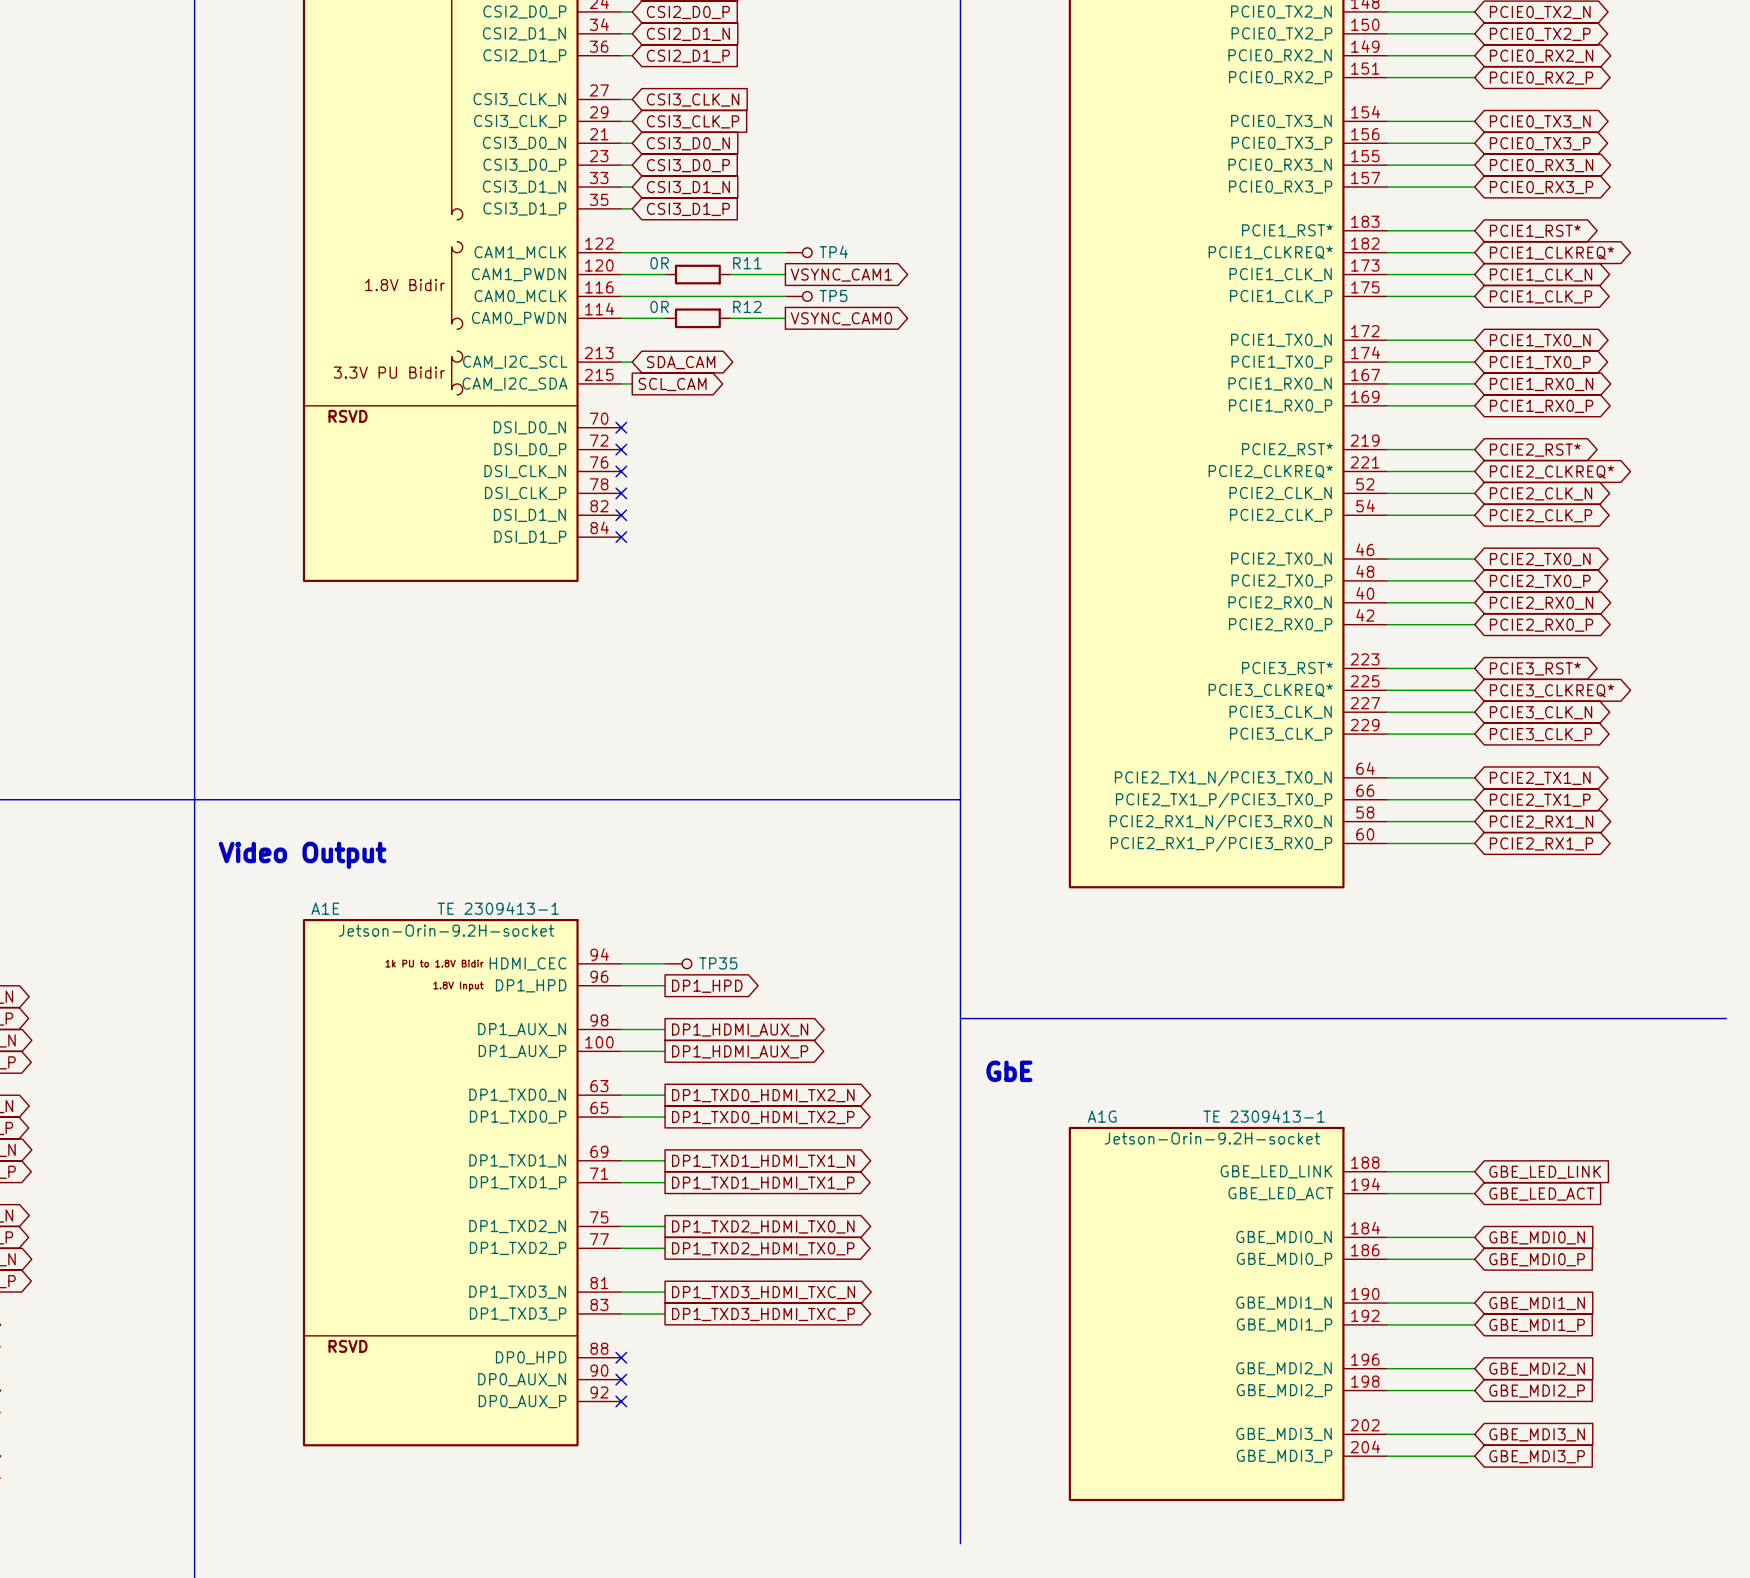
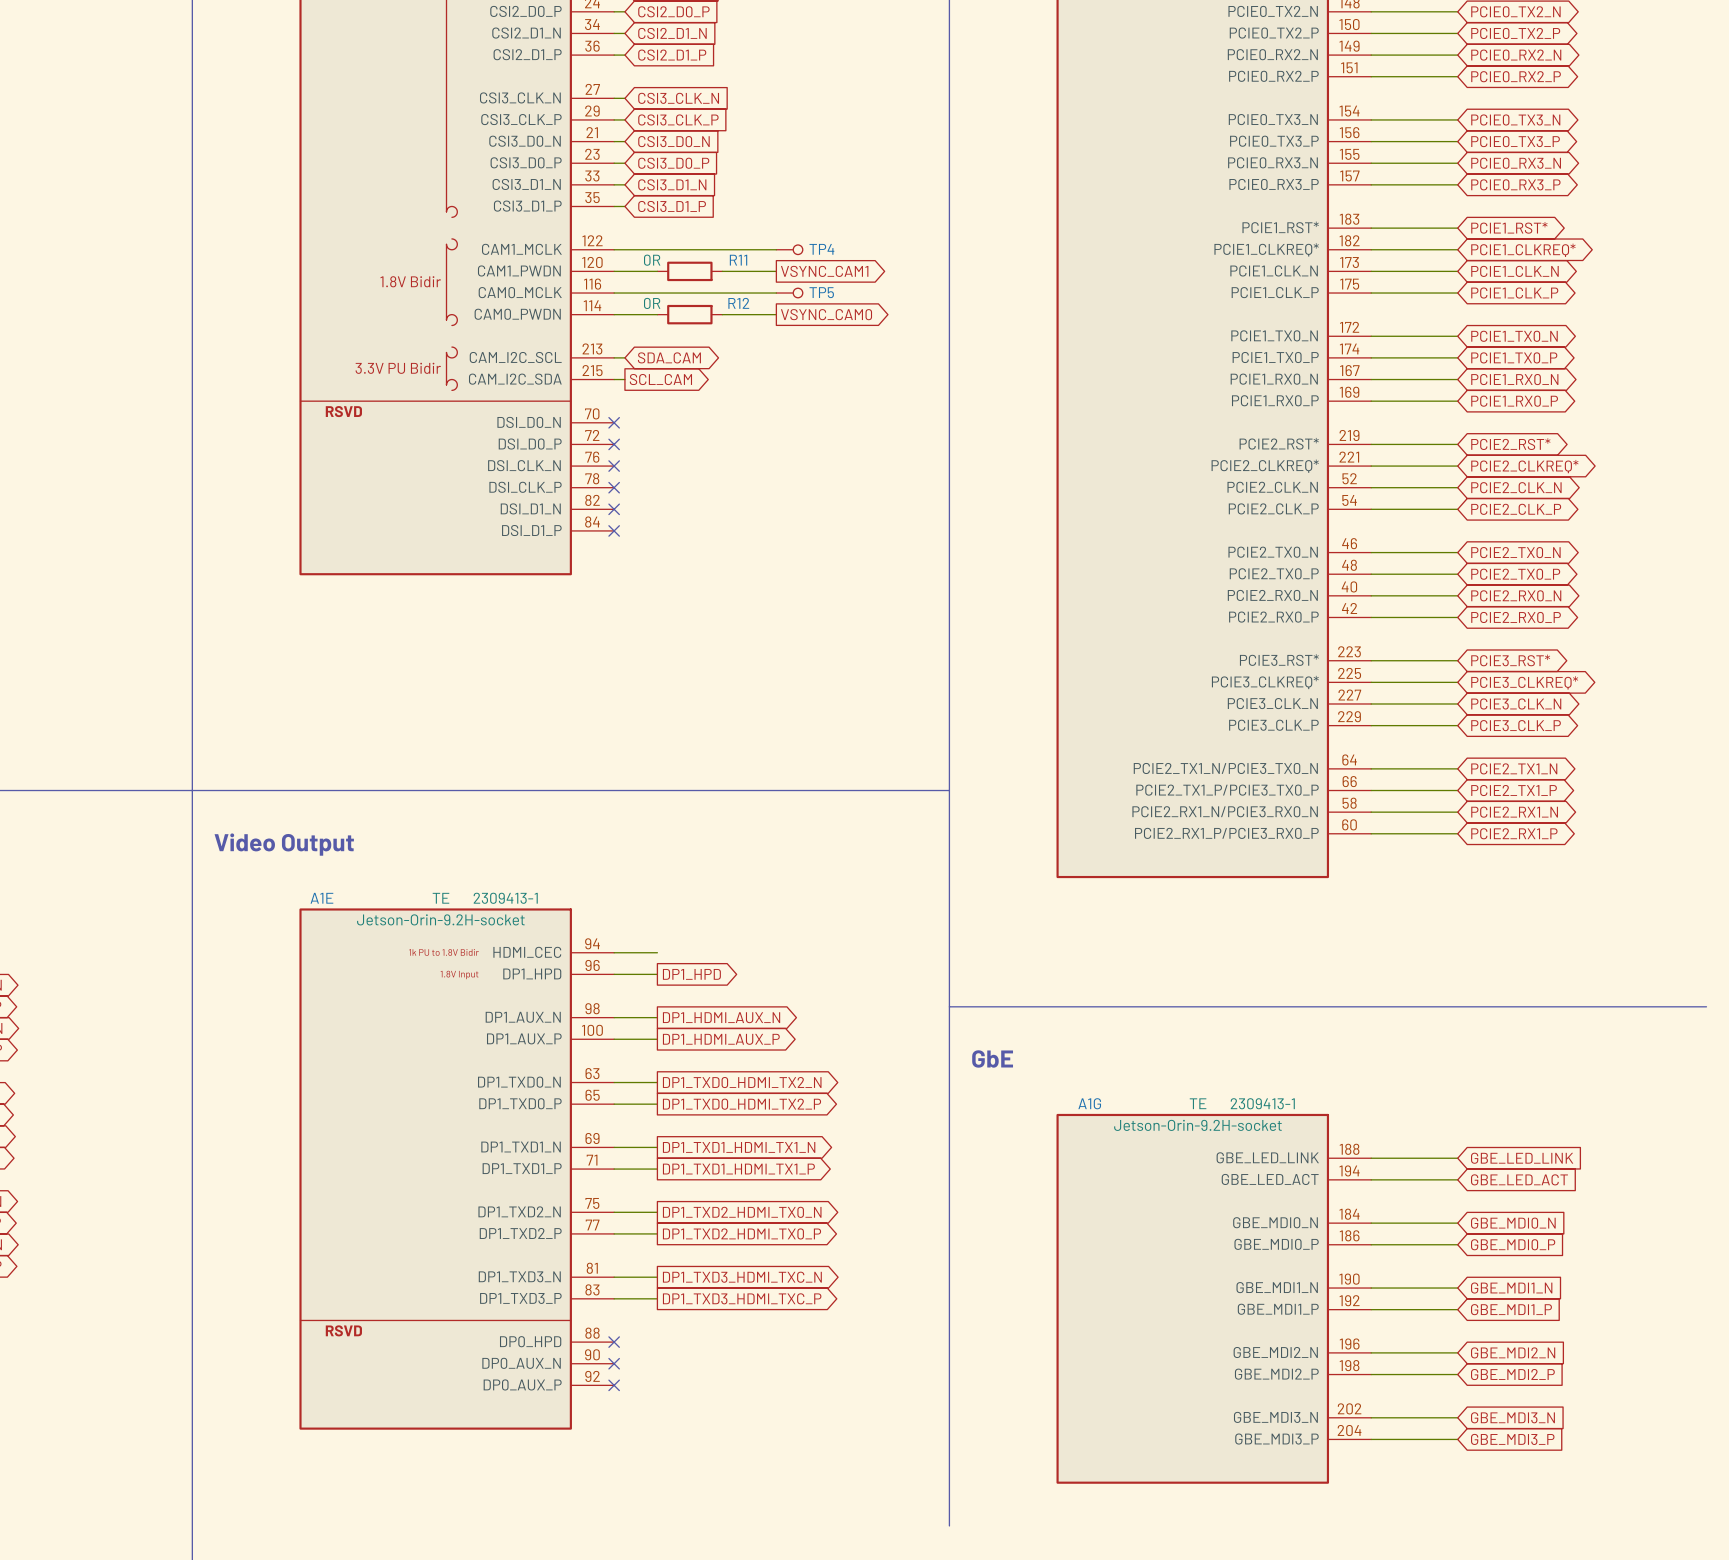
TP35: (678, 963) -> none

